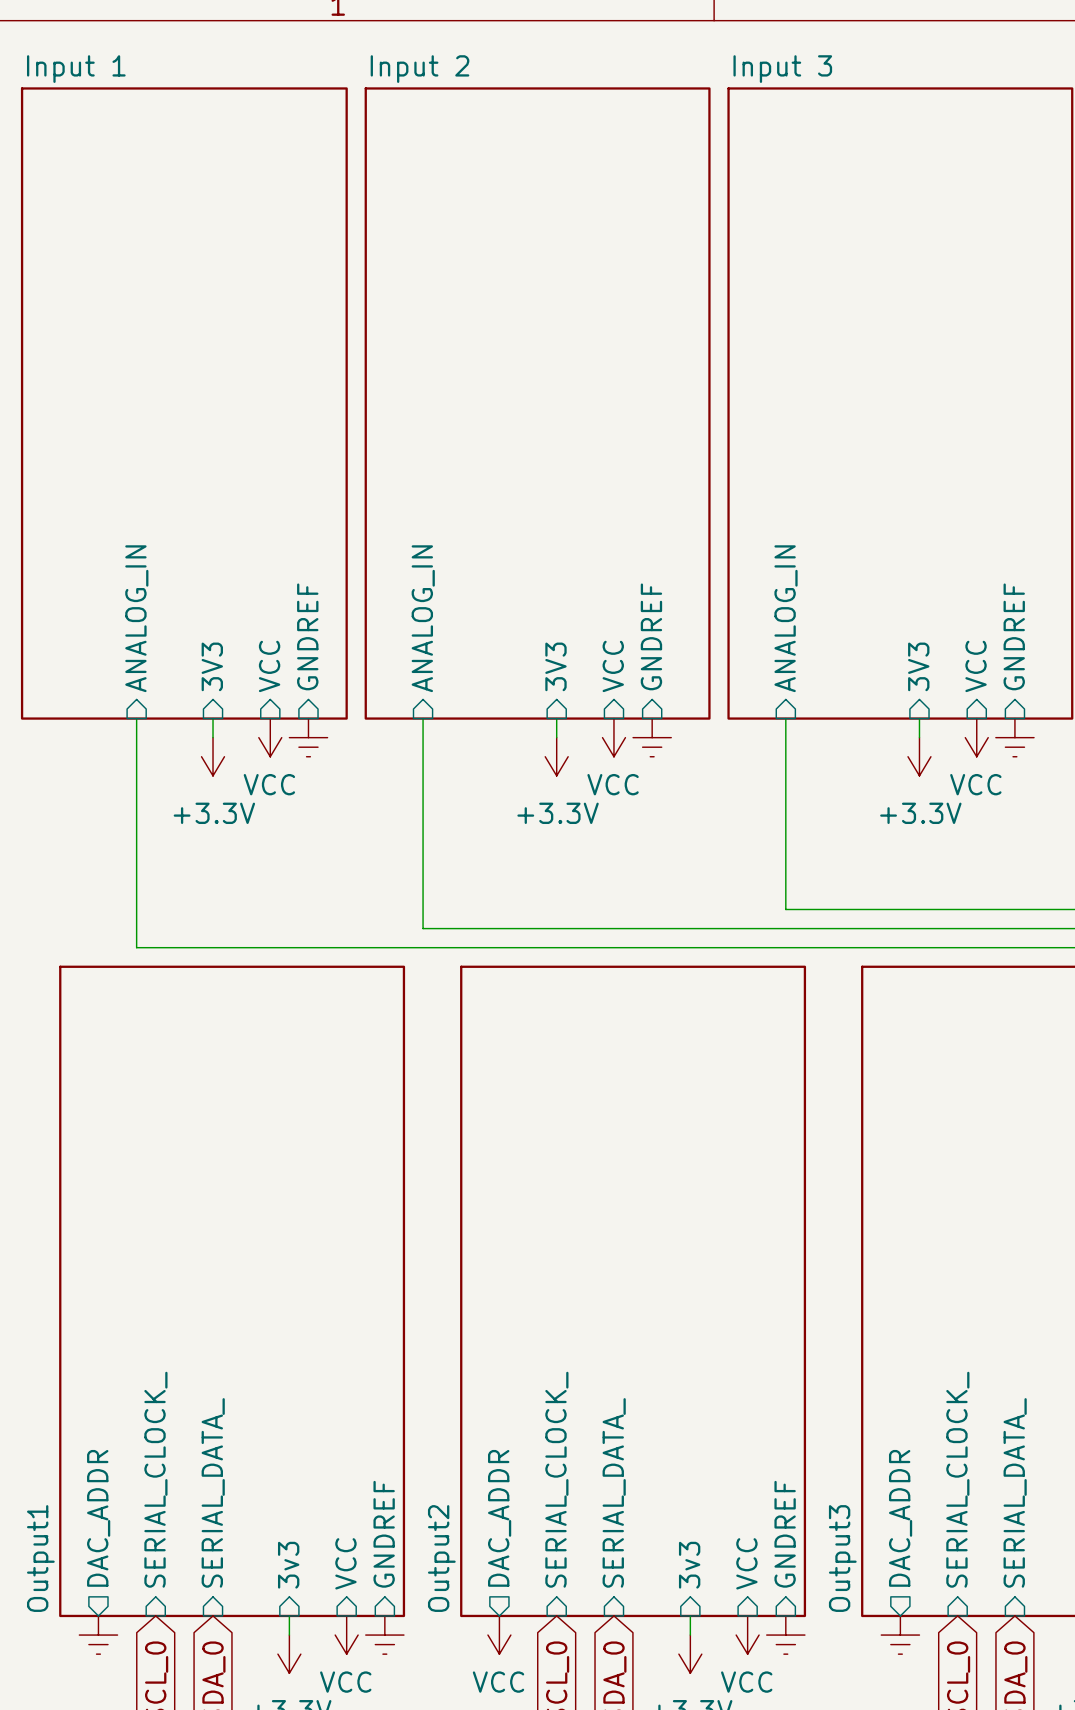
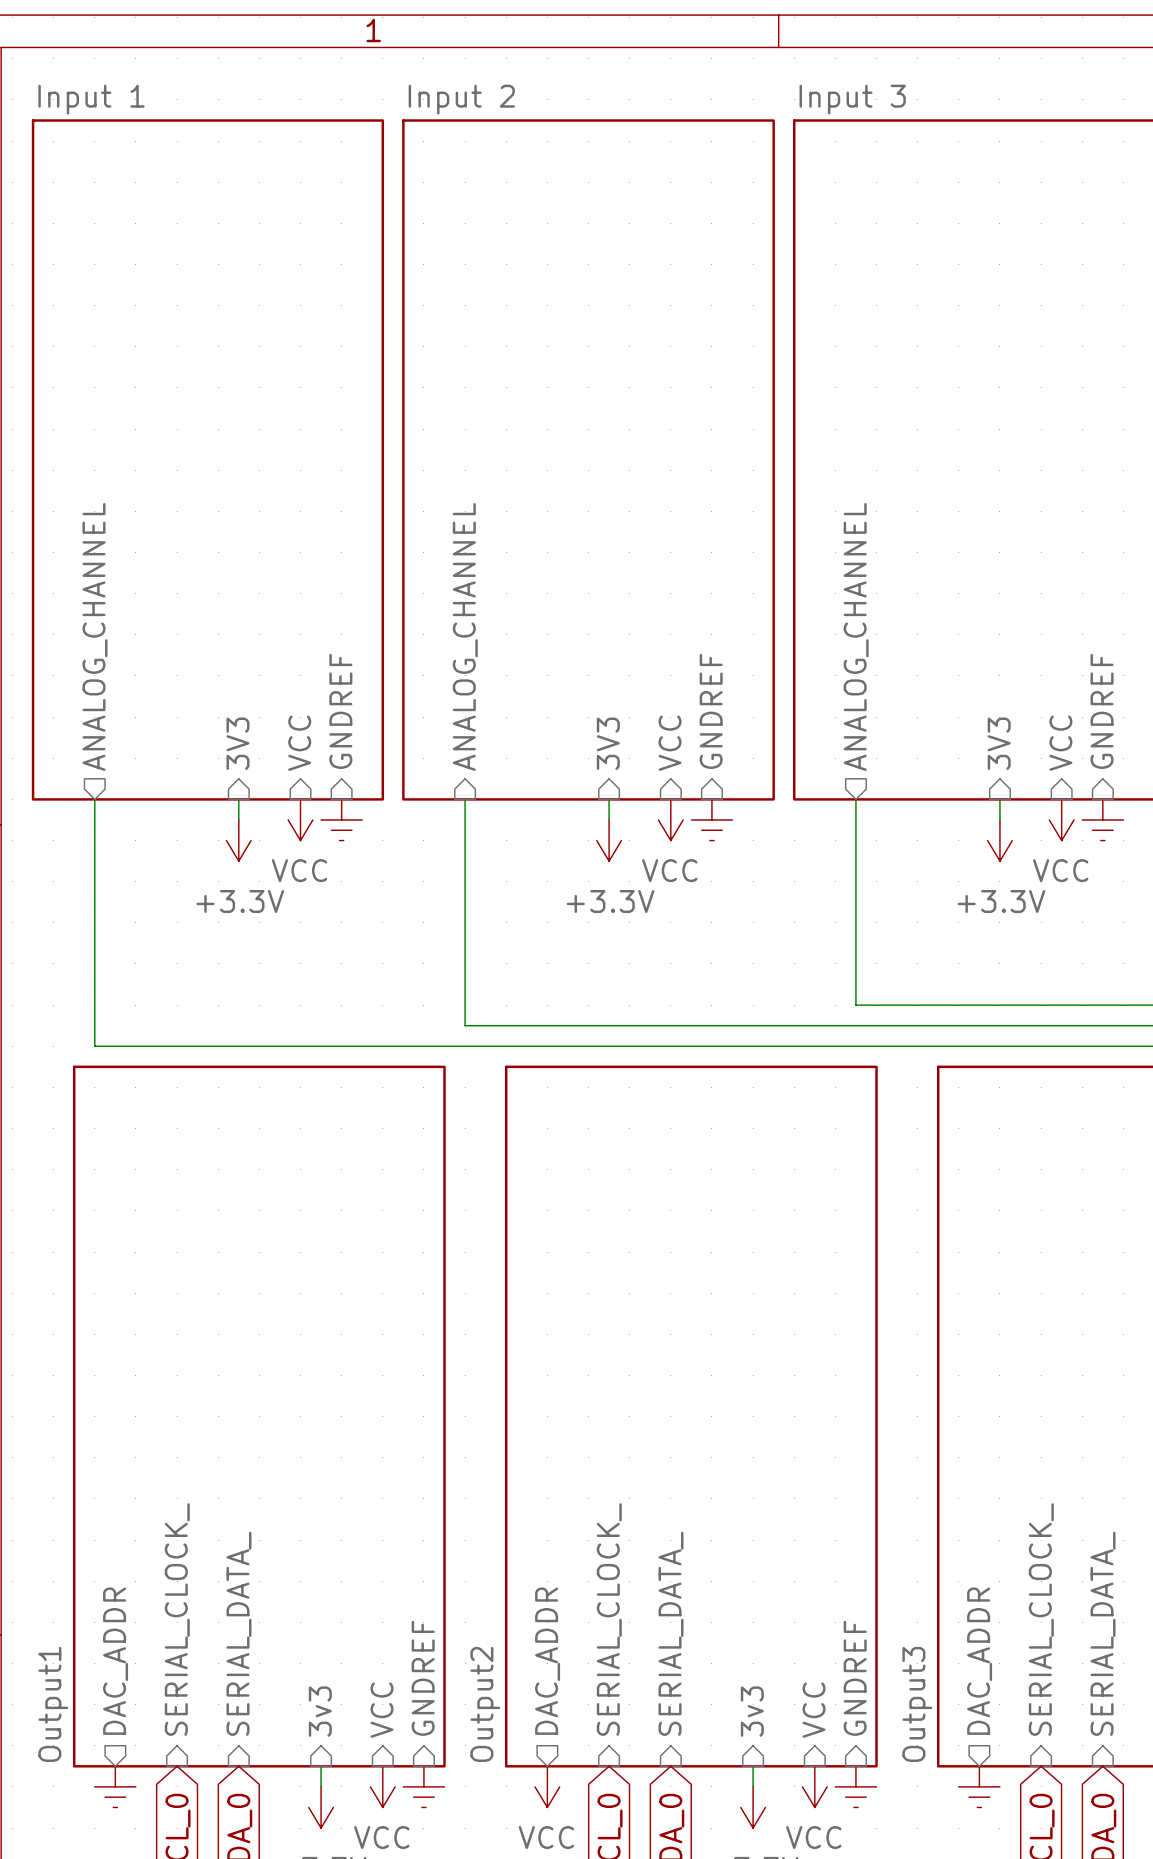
sheet pin: none -> ANALOG_CHANNEL (94, 636)
sheet pin: ANALOG_IN (136, 618) -> none
sheet pin: ANALOG_IN (423, 618) -> ANALOG_CHANNEL (465, 636)
sheet pin shape: input (786, 618) -> output (856, 636)
sheet pin: ANALOG_IN (786, 618) -> ANALOG_CHANNEL (856, 636)
wire: (136, 718) (136, 947) -> (94, 799) (94, 1046) (156, 1046)

